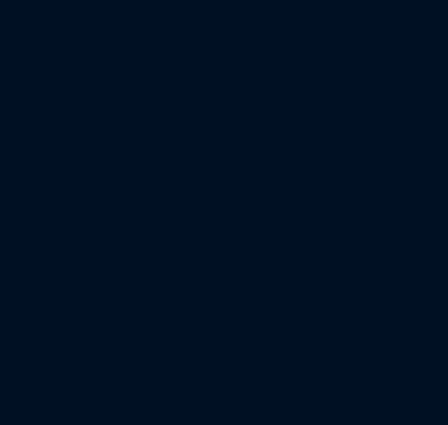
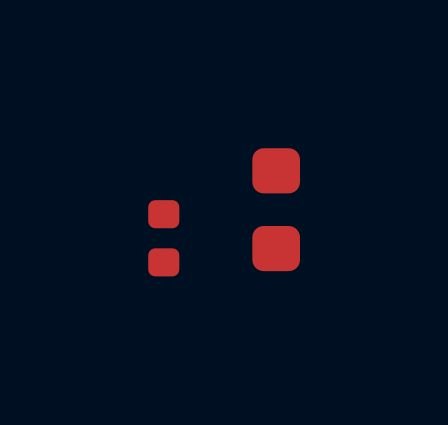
part: none -> (276, 209)
part: none -> (163, 238)

